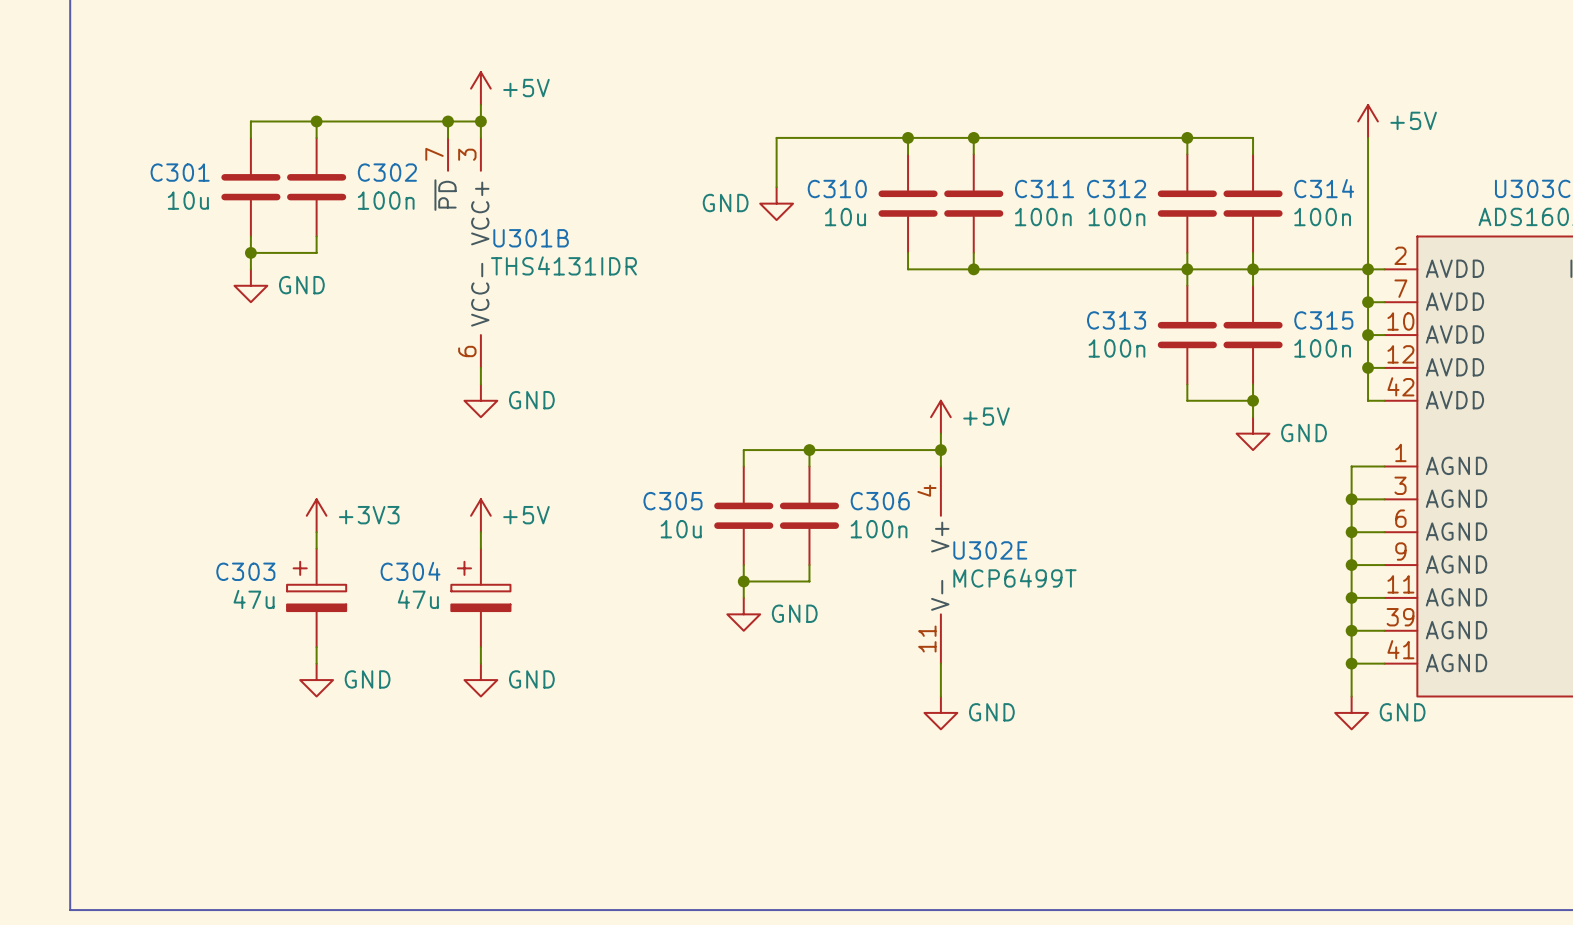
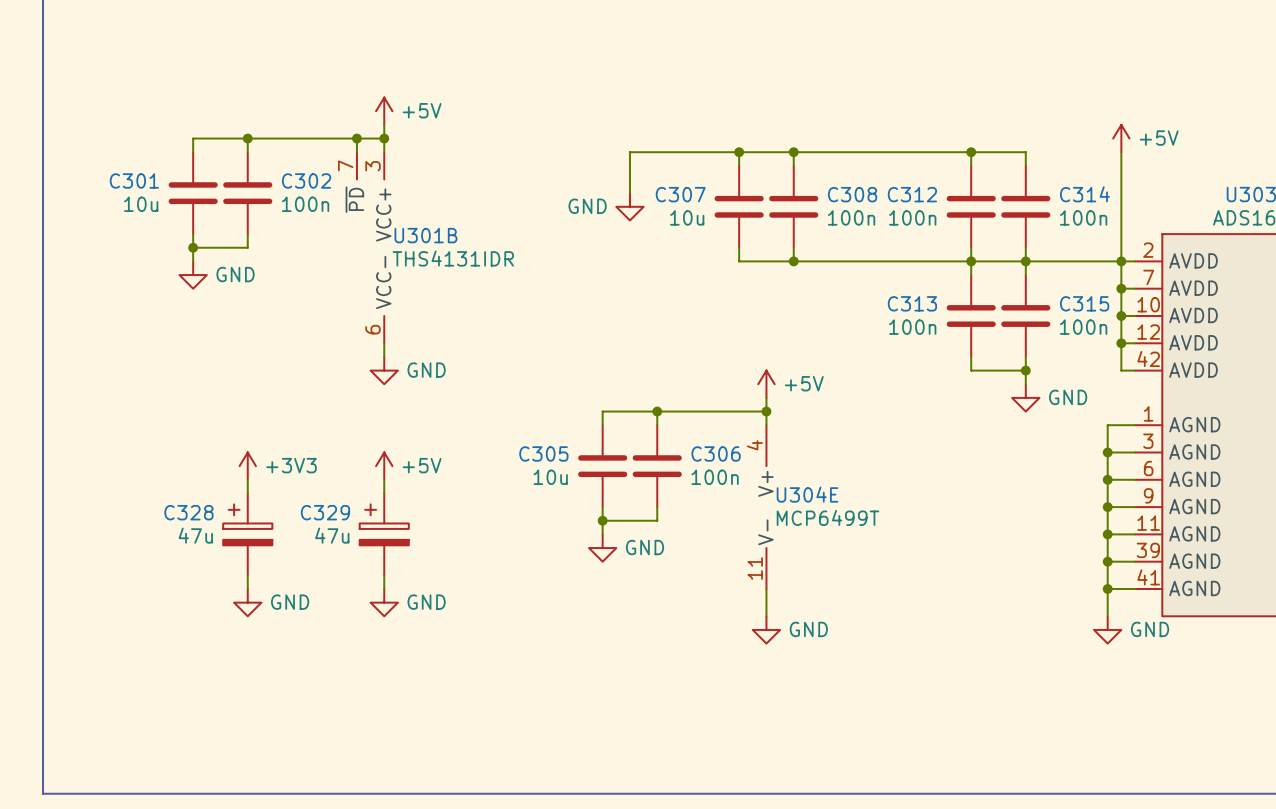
C310 name: C310 (837, 189) -> C307 (680, 194)
C311 name: C311 (1044, 189) -> C308 (852, 194)
U302E name: U302E (990, 550) -> U304E (807, 494)
C303 name: C303 (245, 571) -> C328 (188, 512)
C304 name: C304 (410, 571) -> C329 (325, 512)

